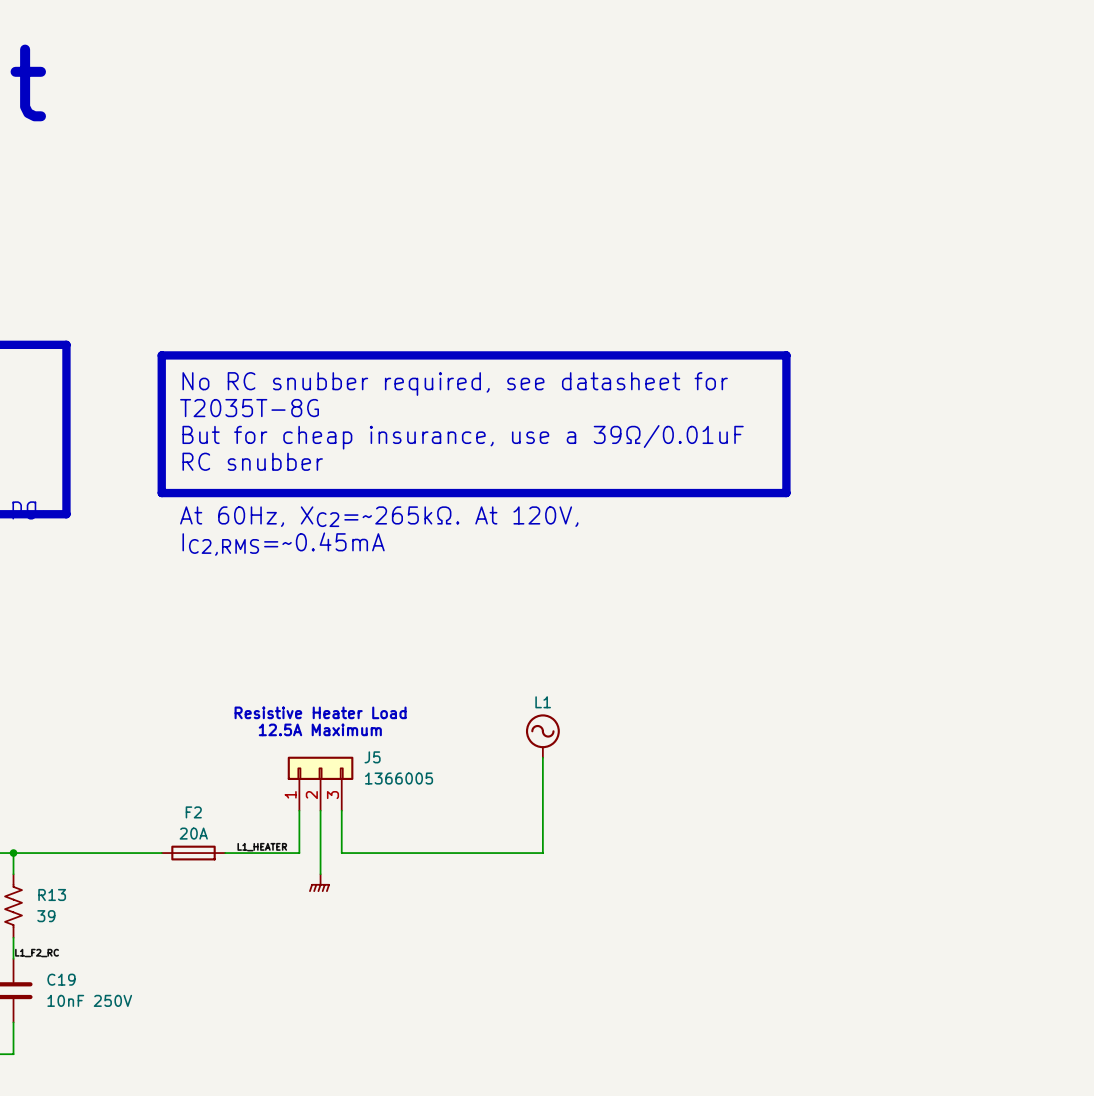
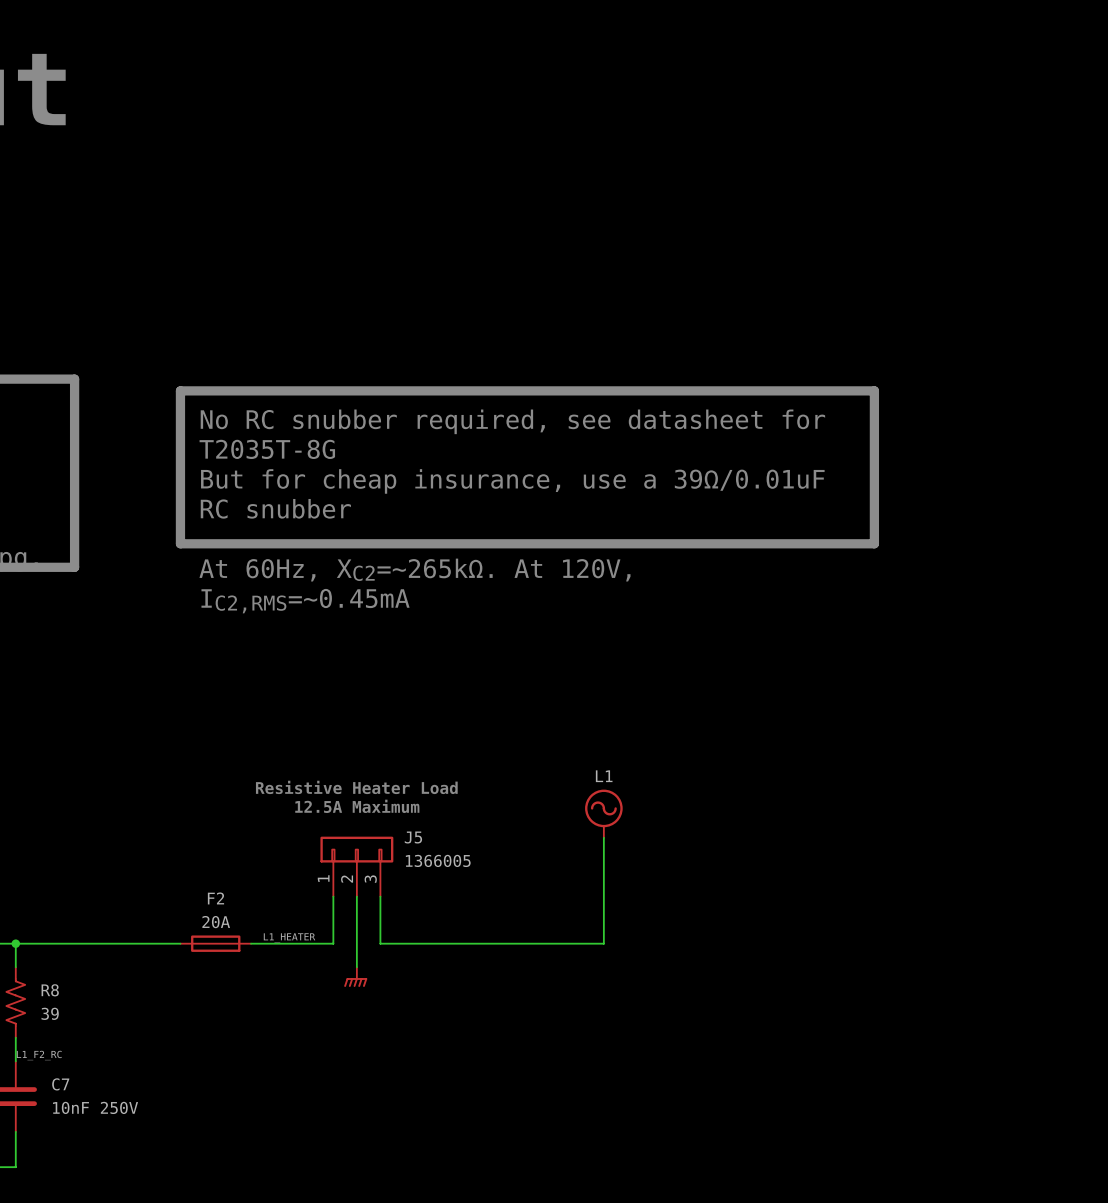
R13 name: R13 (52, 894) -> R8 (50, 990)
C19 name: C19 (61, 979) -> C7 (60, 1084)

